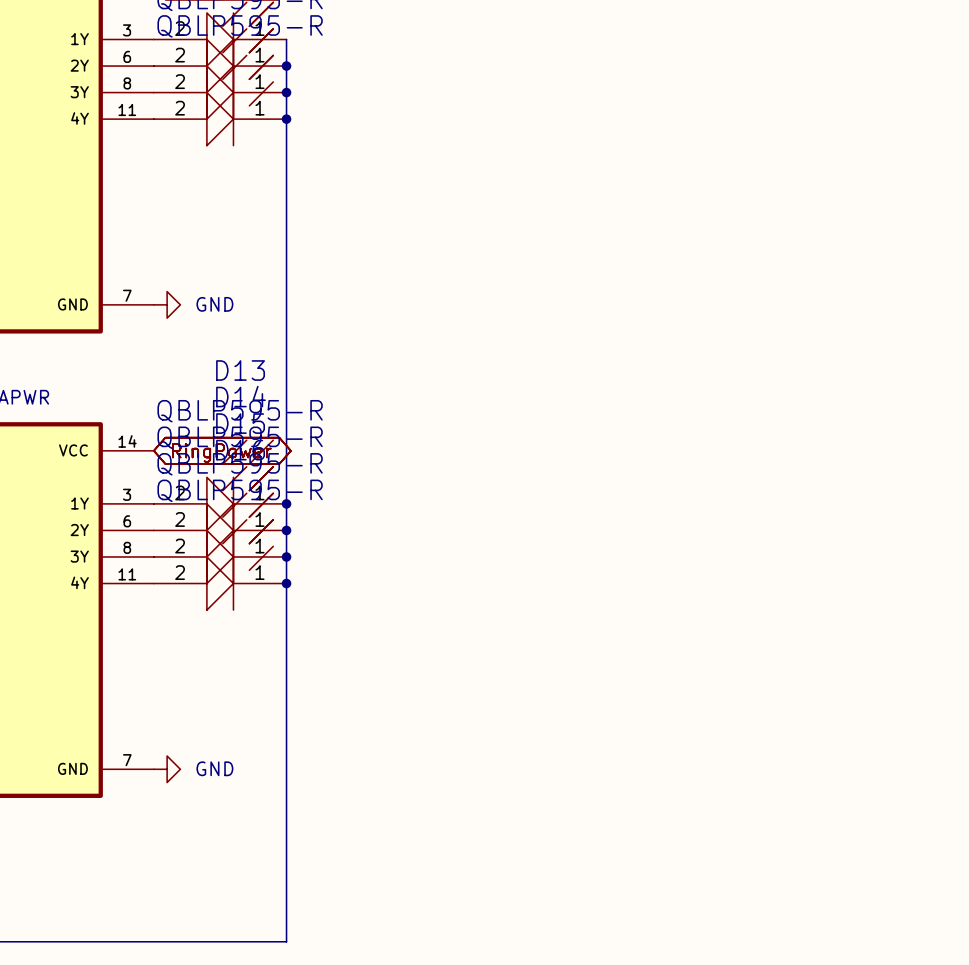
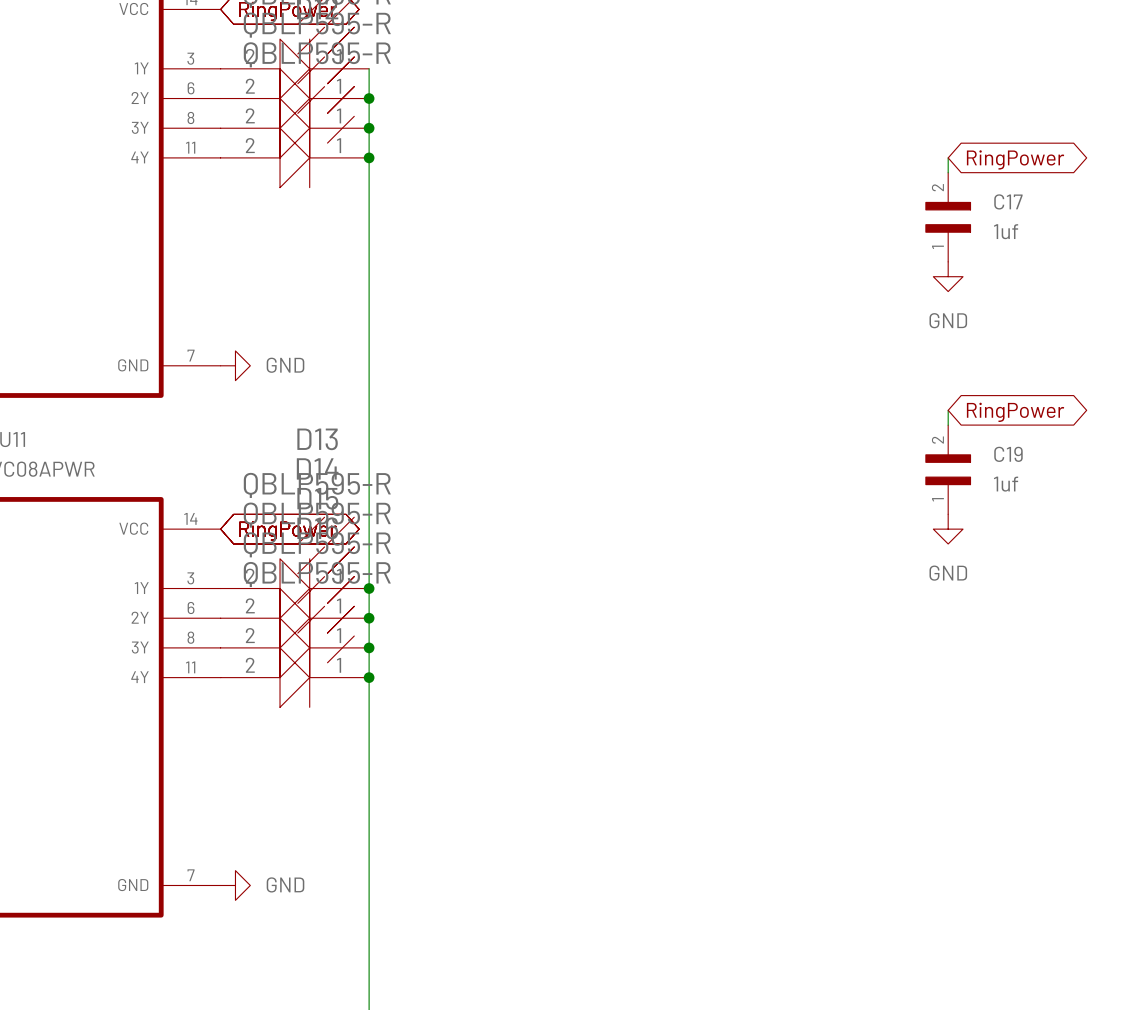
wire: none -> (948, 157) (948, 172)
global label: none -> RingPower (1015, 159)
C17: none -> 1uf (948, 217)
power symbol: none -> GND (948, 276)
wire: none -> (948, 410) (948, 425)
global label: none -> RingPower (1015, 412)
C19: none -> 1uf (948, 469)
power symbol: none -> GND (948, 529)

